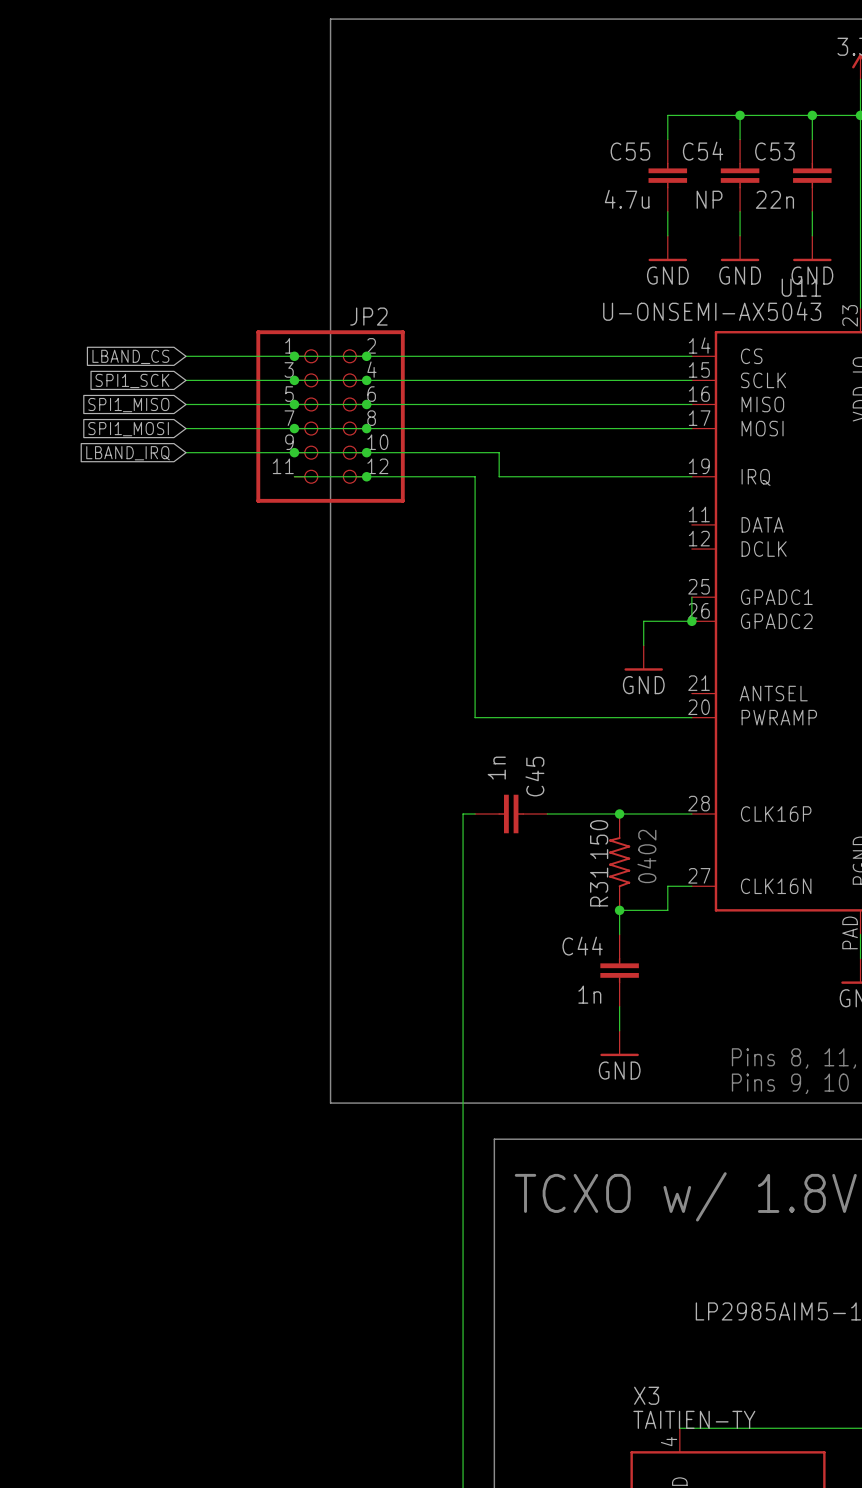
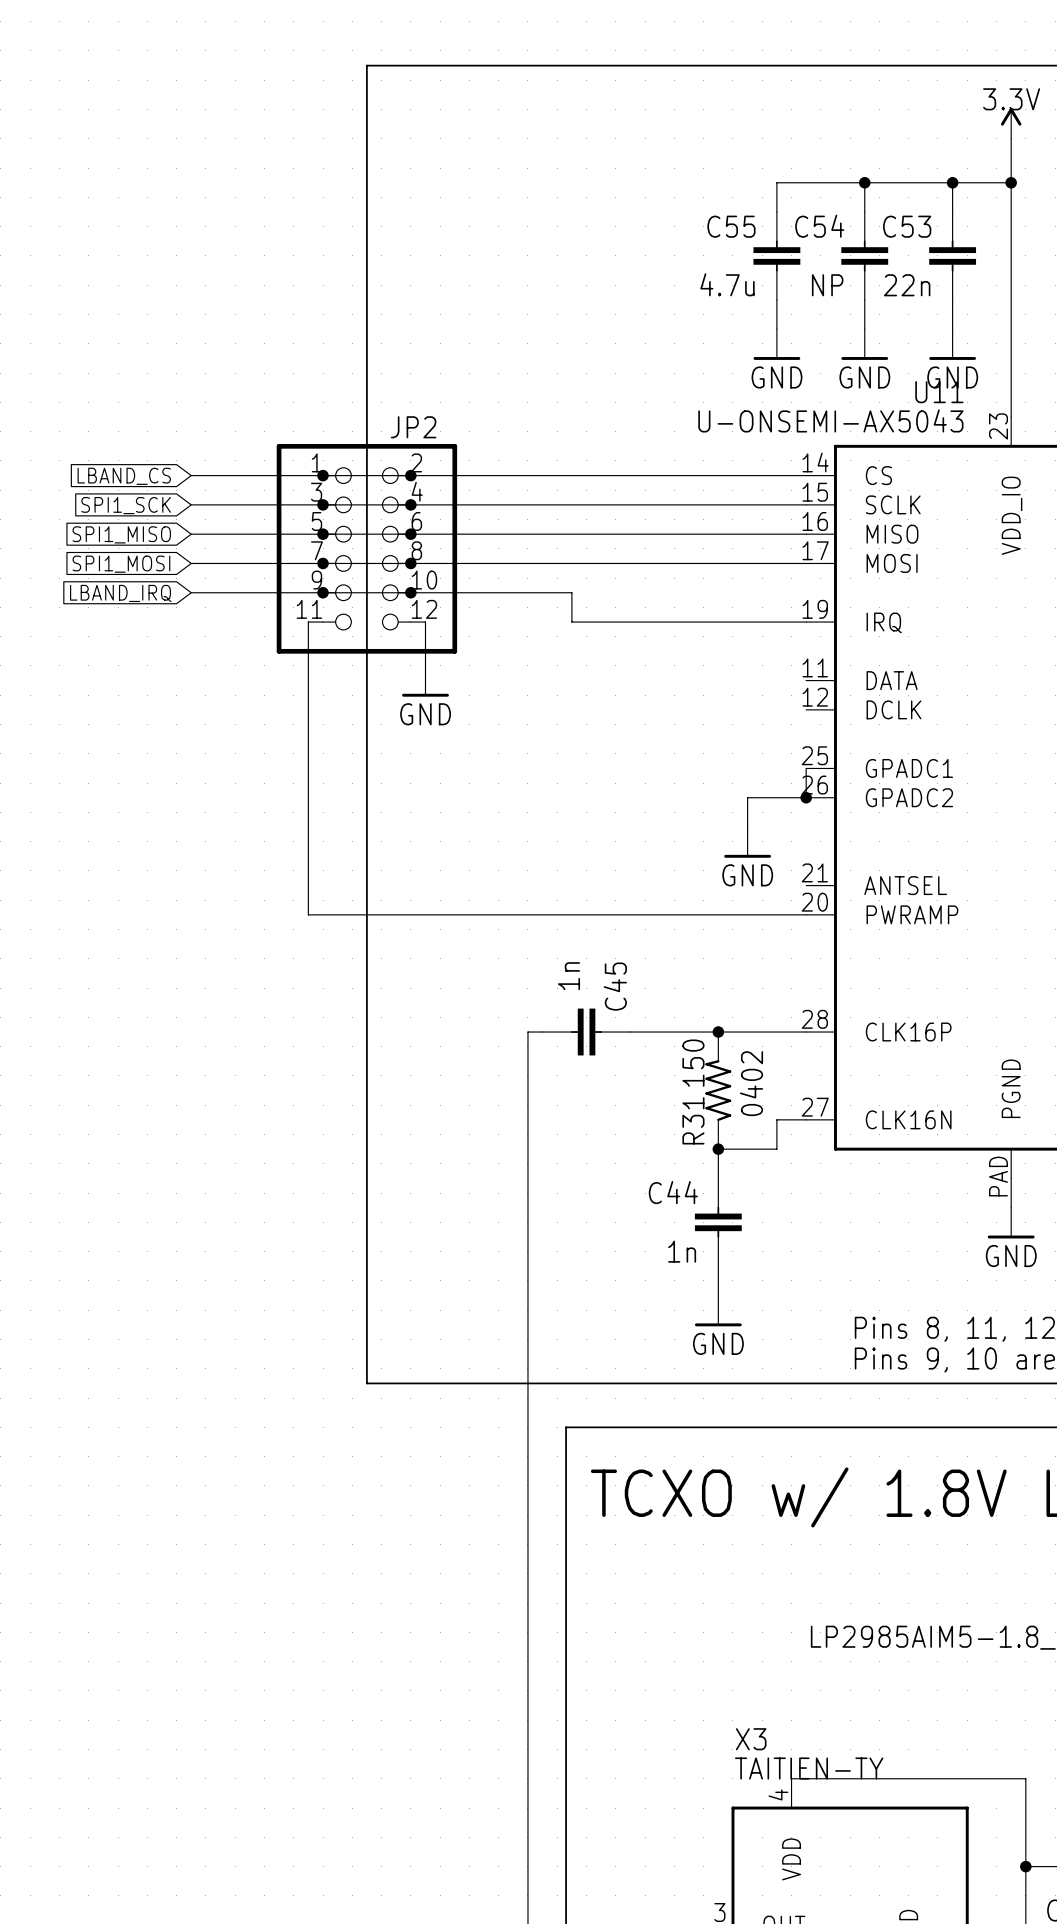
wire: (294, 476) (366, 476) -> none
junction: (366, 476) -> none
wire: (378, 476) (475, 476) (475, 717) -> (323, 622) (308, 622) (308, 914) (542, 914)
wire: none -> (425, 622) (425, 665)
power symbol: none -> GND (425, 681)

